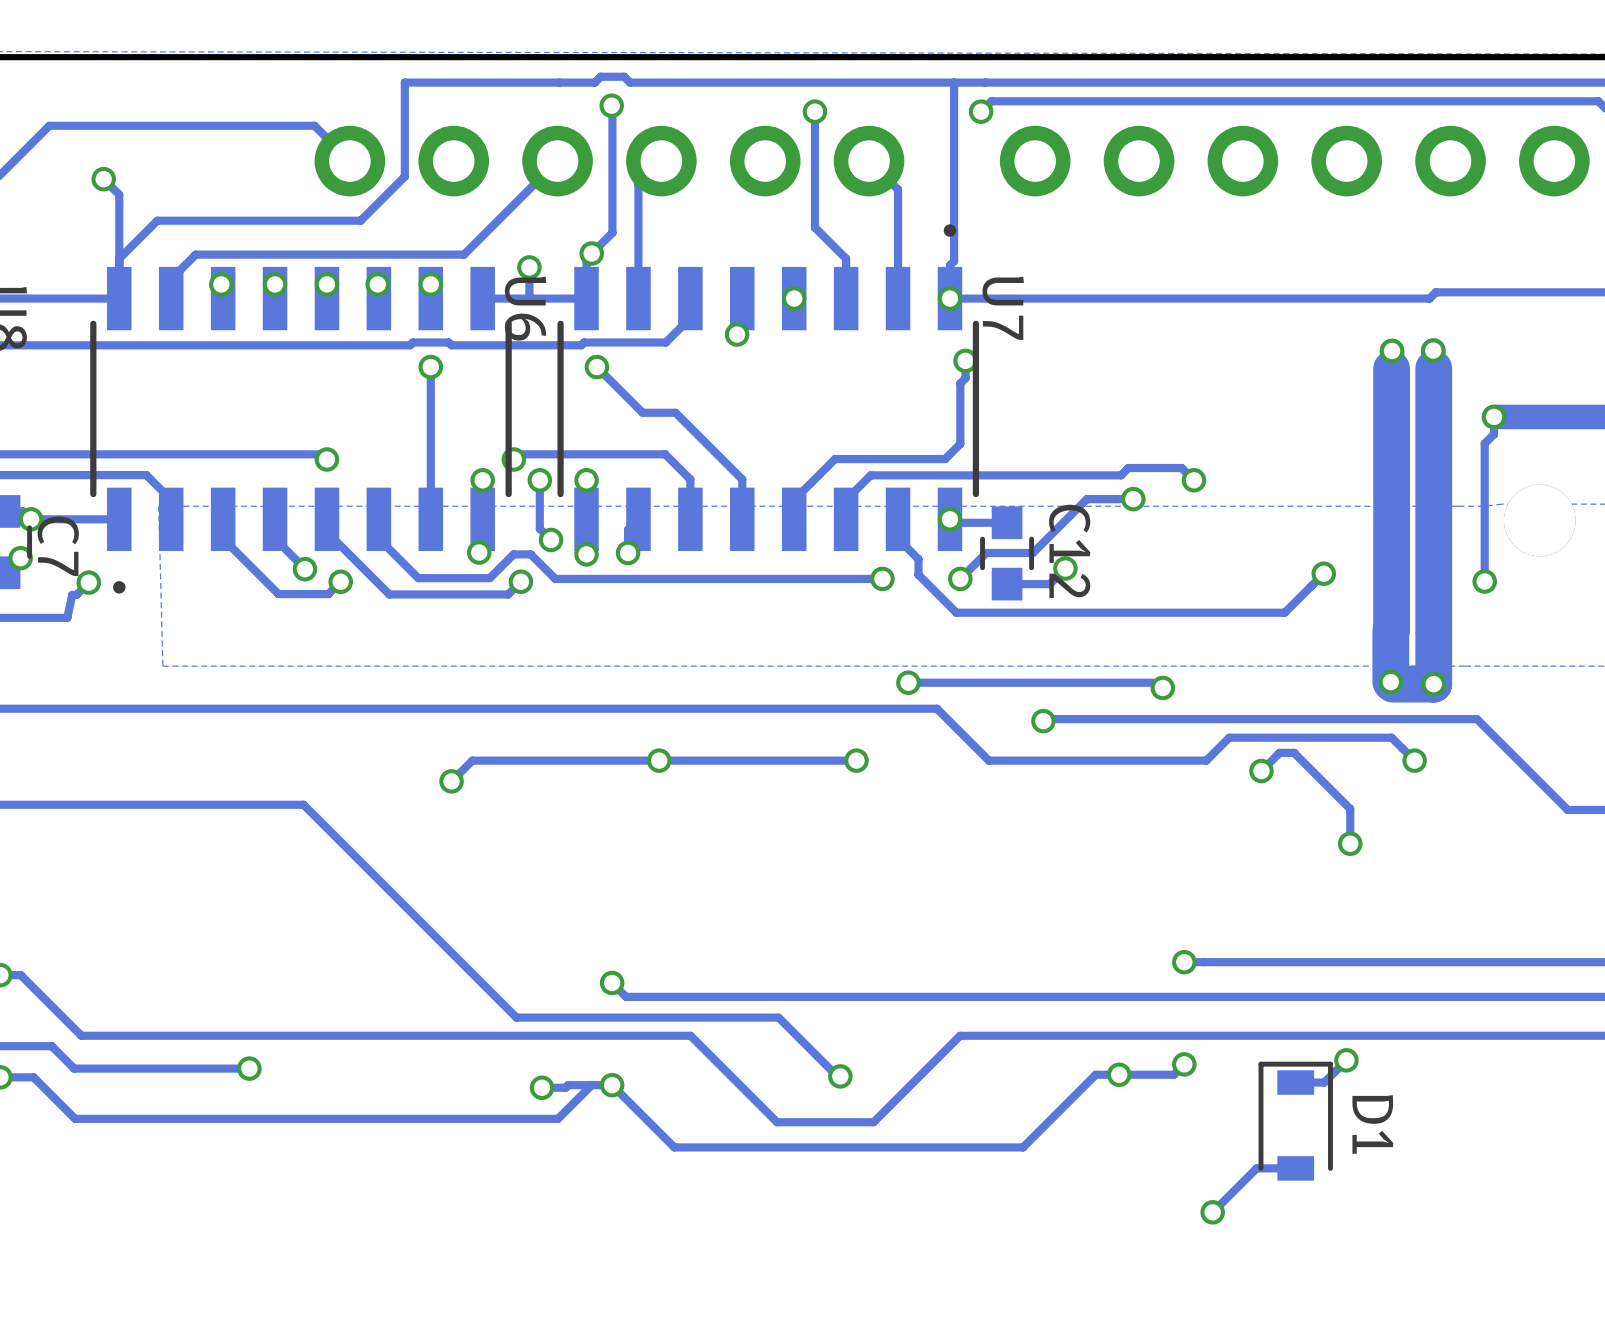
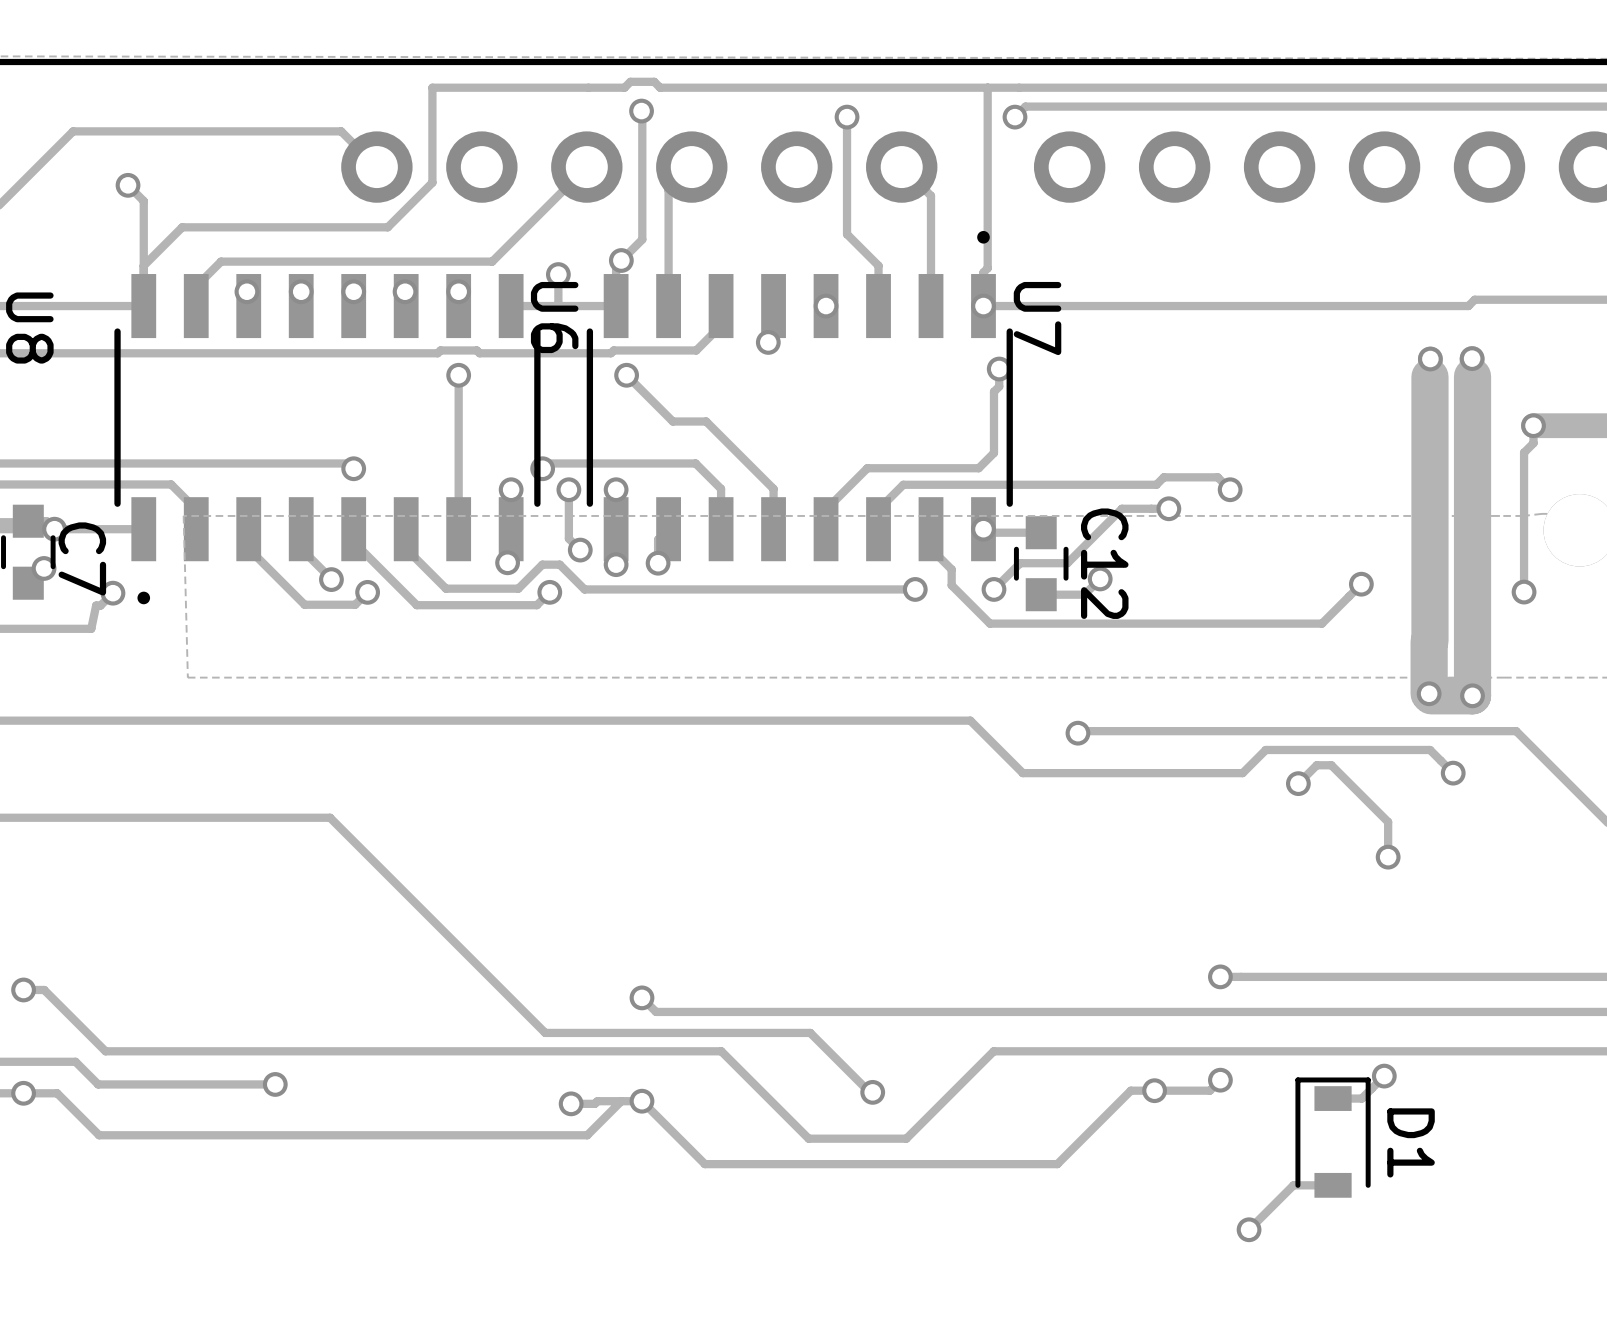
track: (908, 682) (1157, 682) (1162, 687) -> none
via: (908, 682) -> none
via: (1162, 687) -> none
via: (659, 760) -> none
track: (856, 760) (472, 760) (451, 781) -> none
via: (856, 760) -> none
via: (451, 781) -> none

